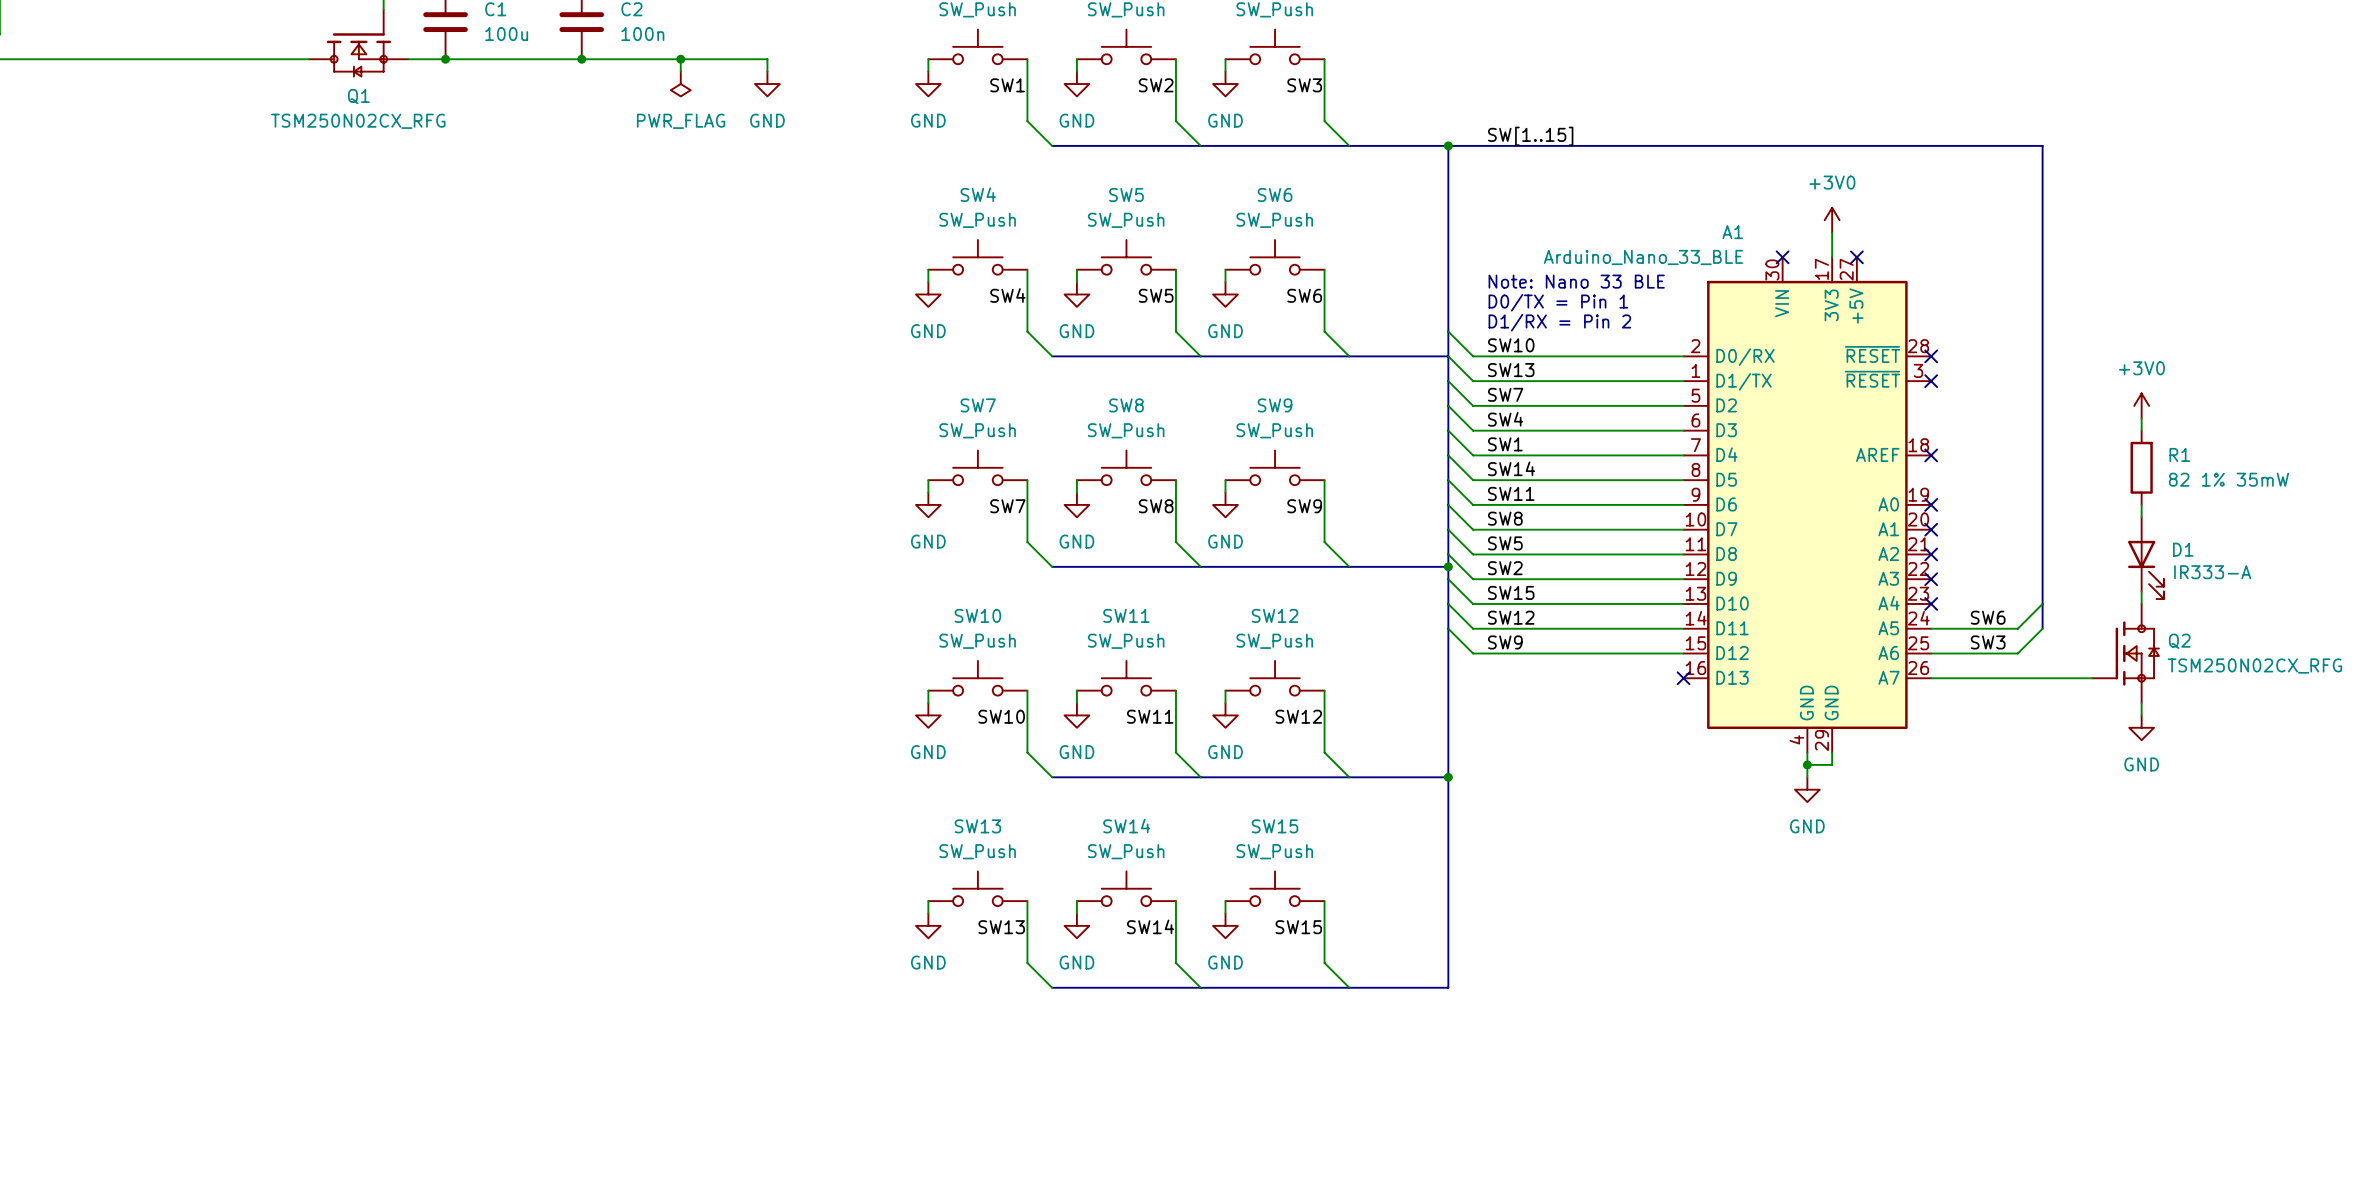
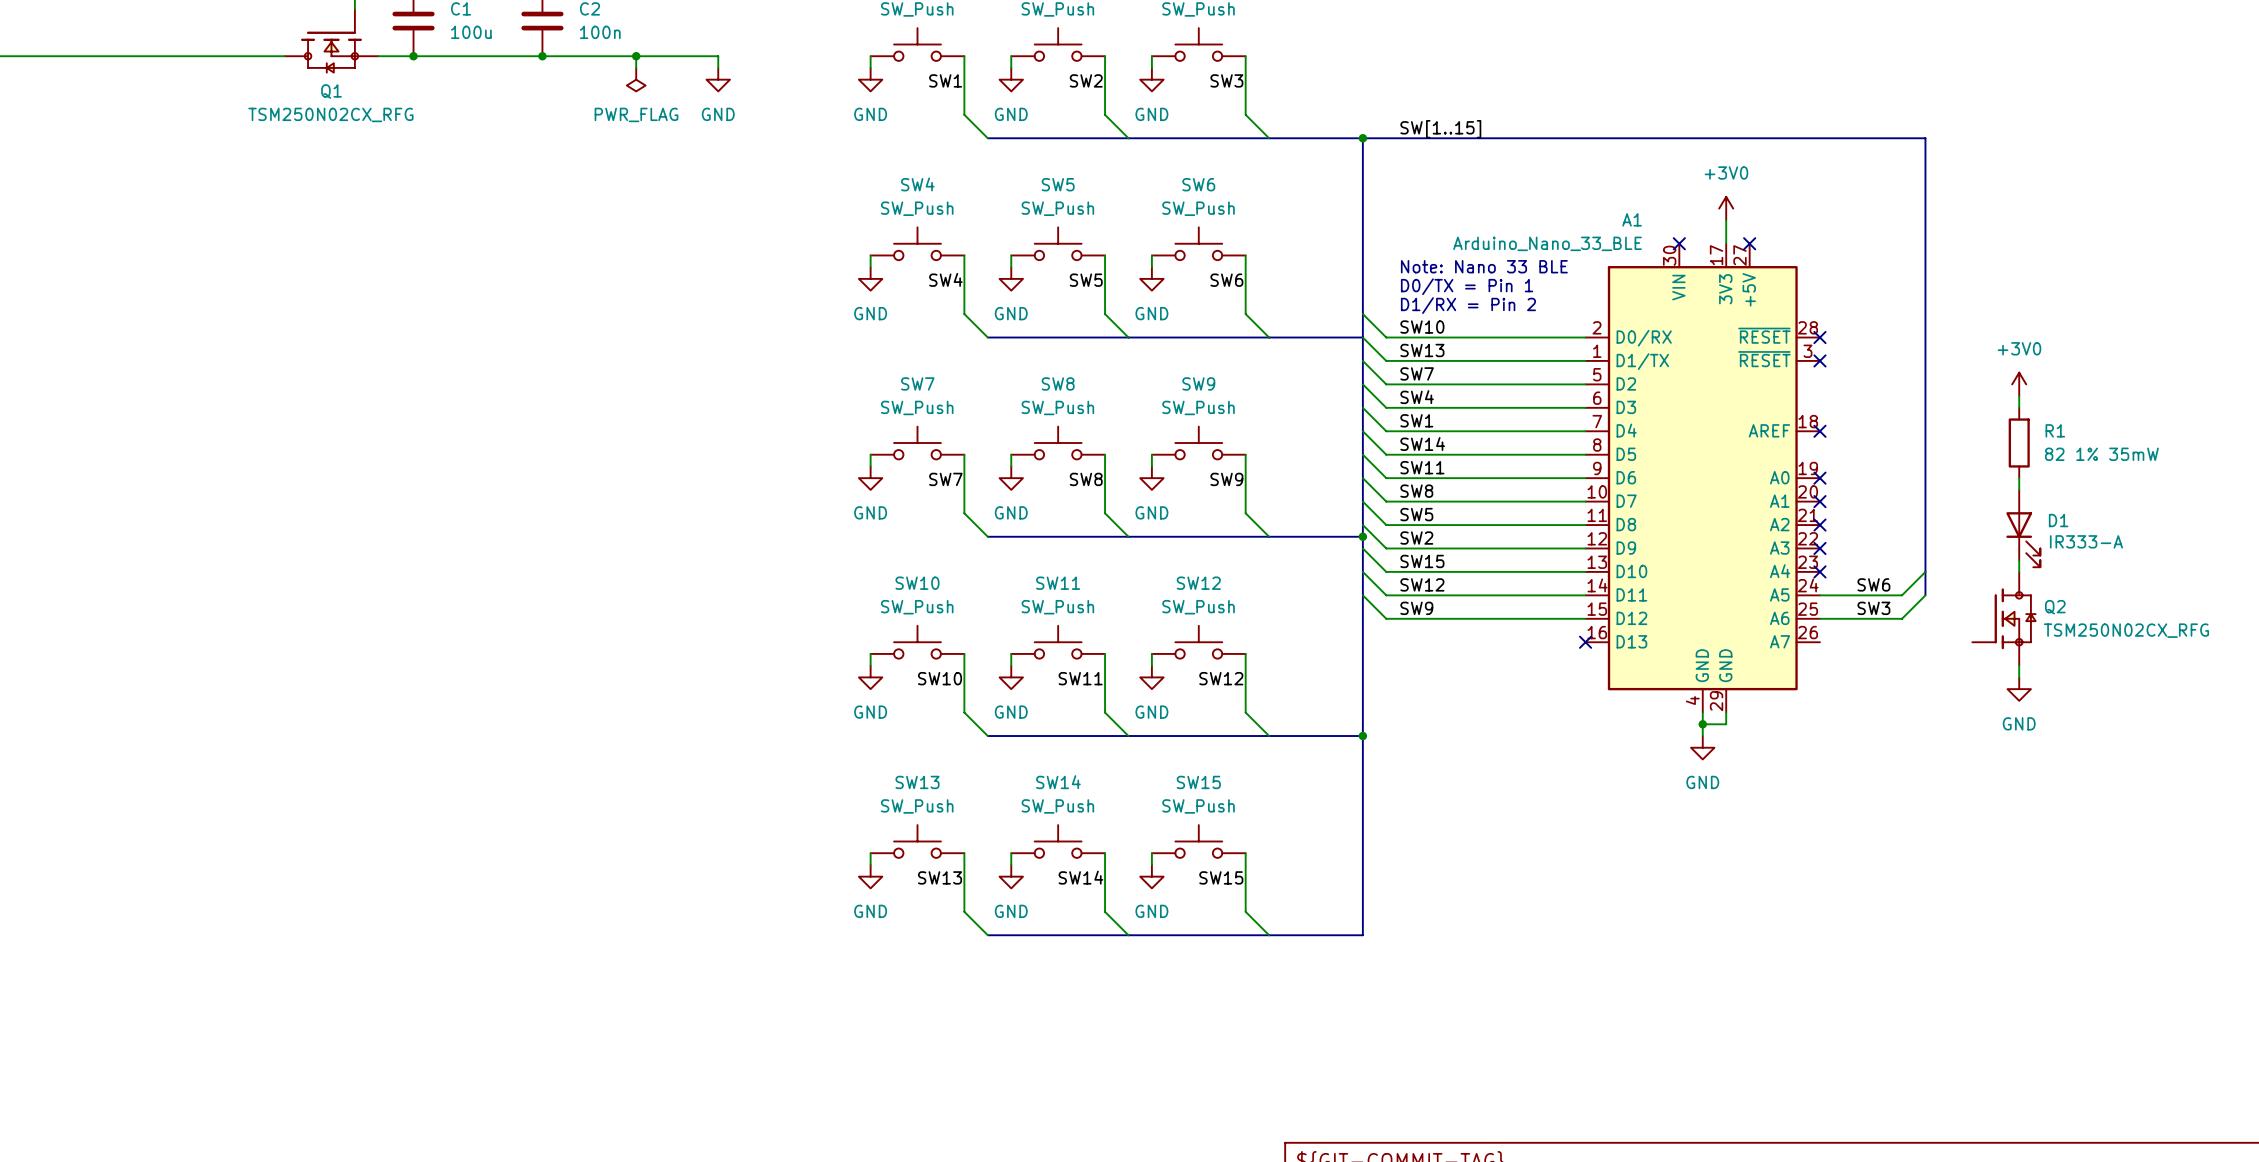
wire: (1931, 678) (2092, 678) -> none

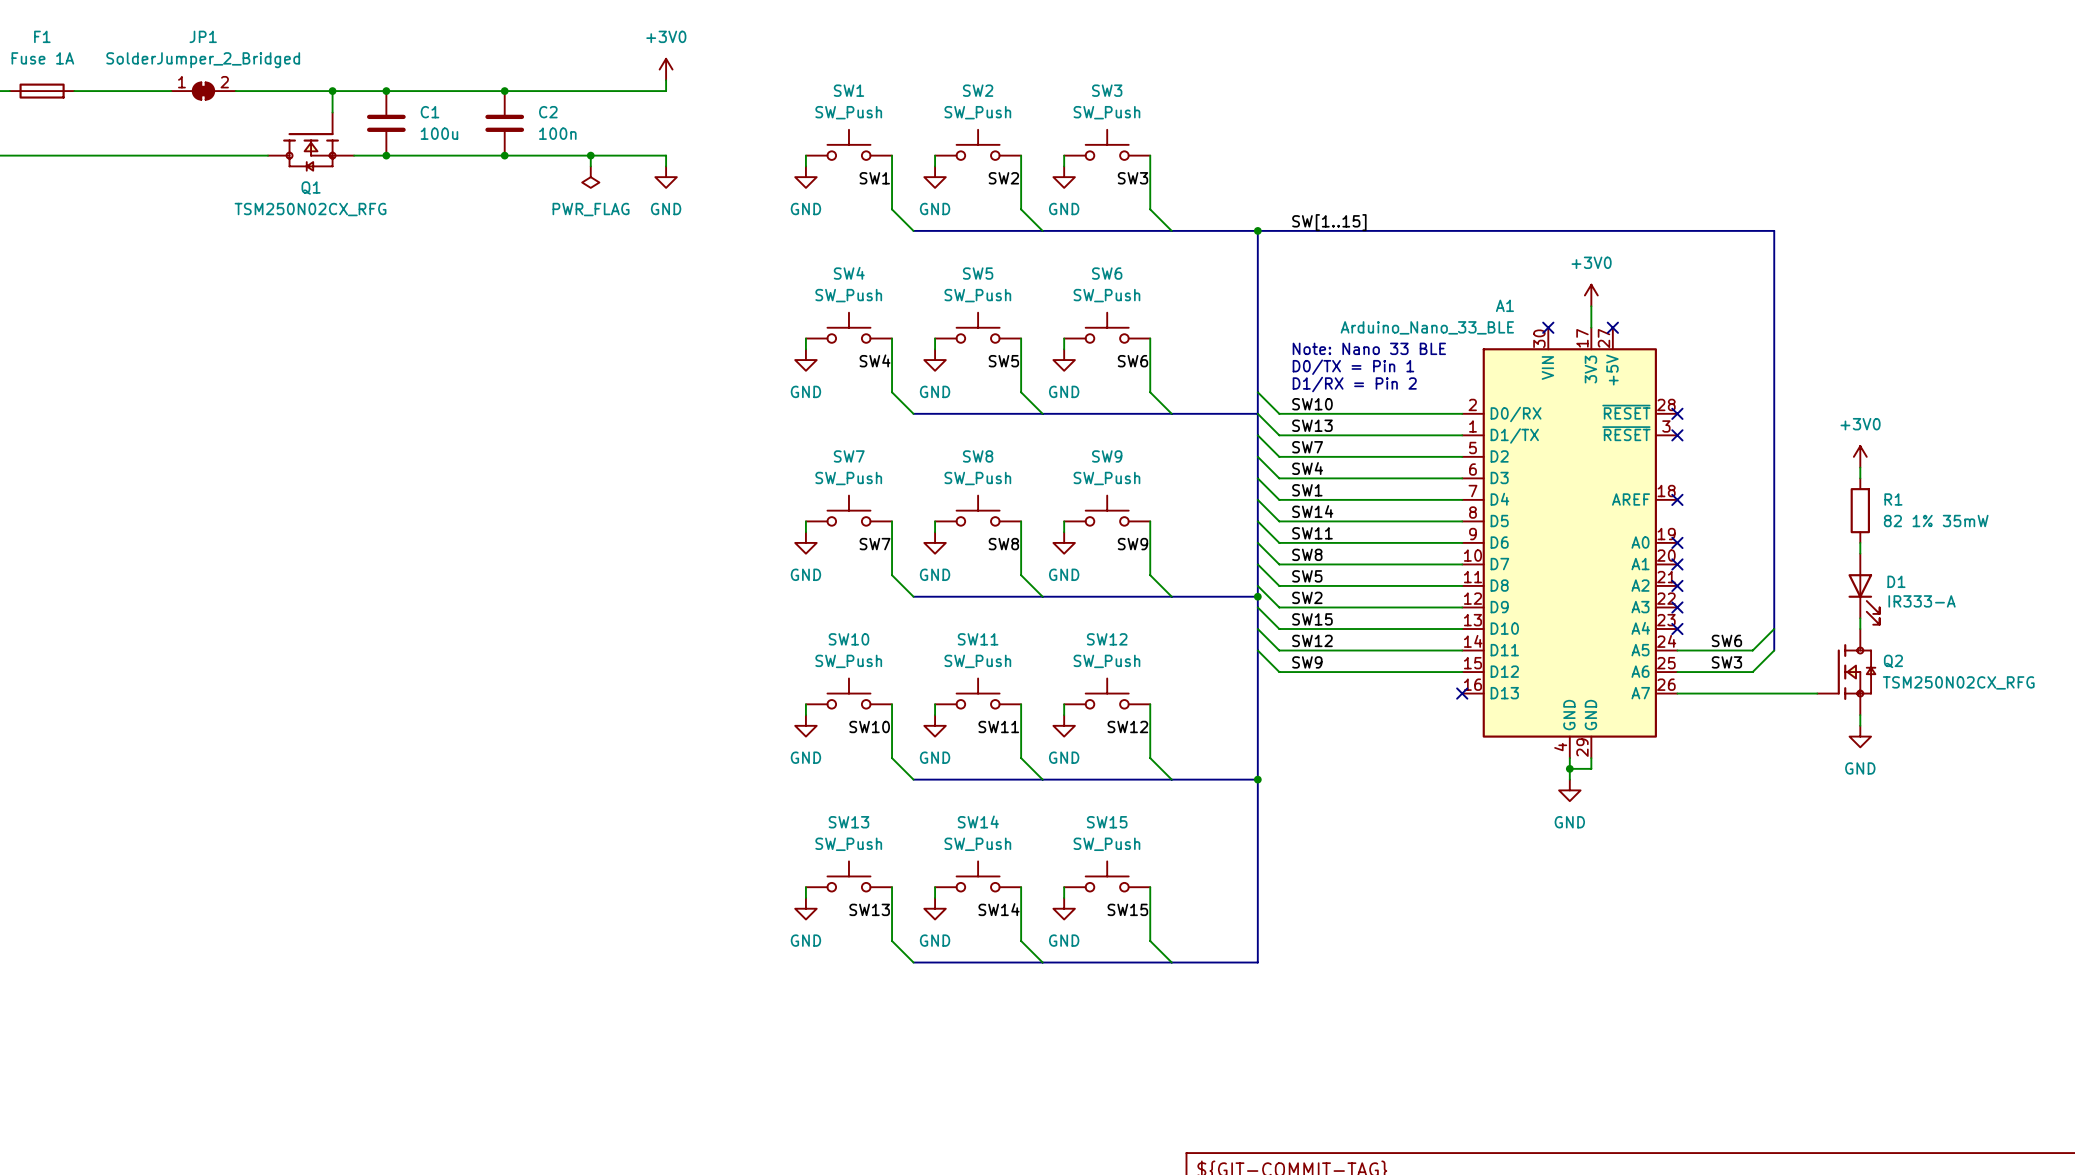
wire: none -> (1677, 693) (1817, 693)

